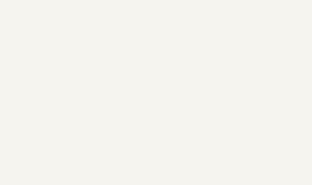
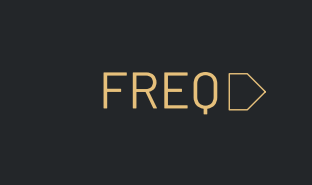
hierarchical label: none -> FREQ (160, 93)

